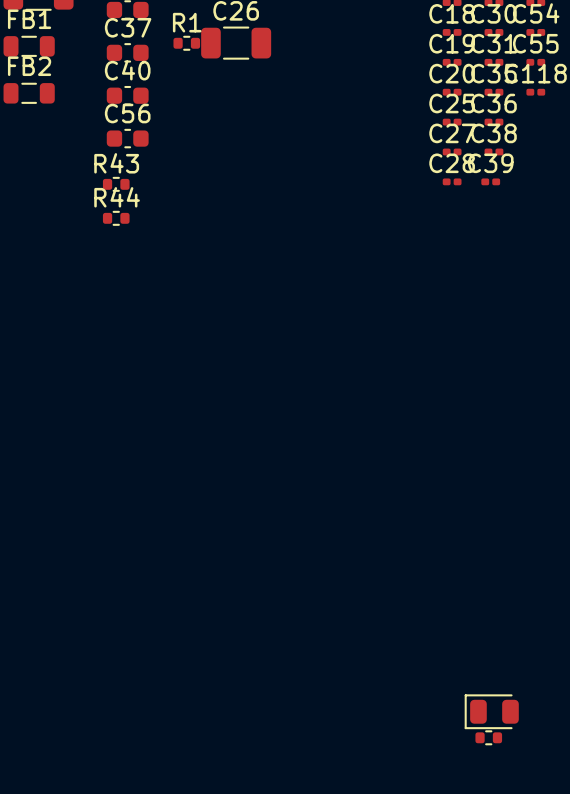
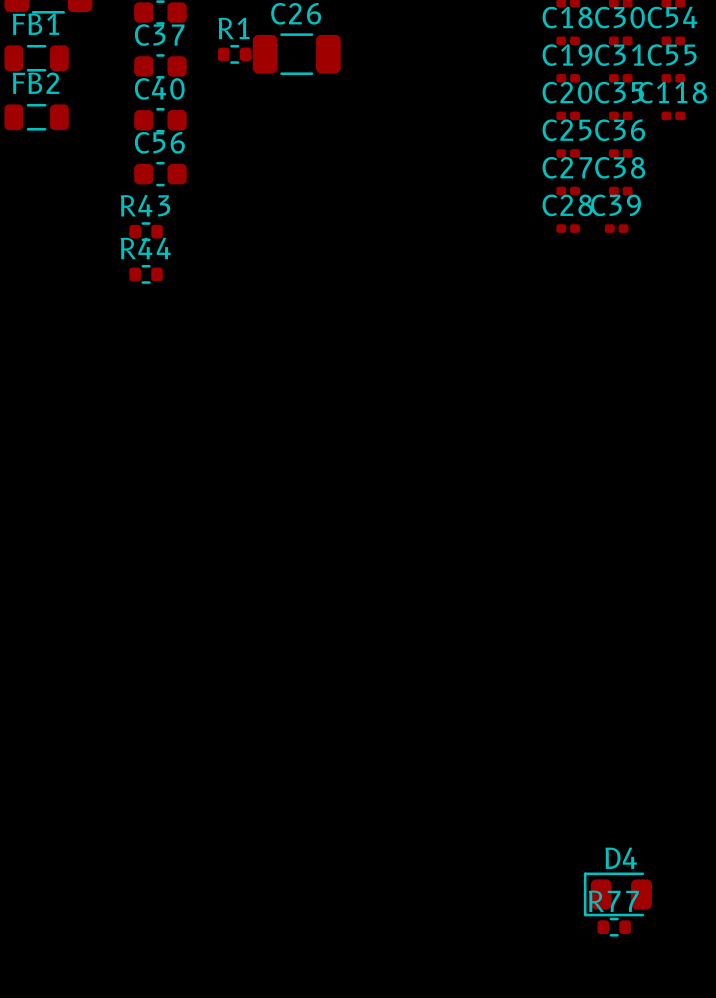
D4 name: none -> D4 (621, 858)
R77 name: none -> R77 (613, 901)

